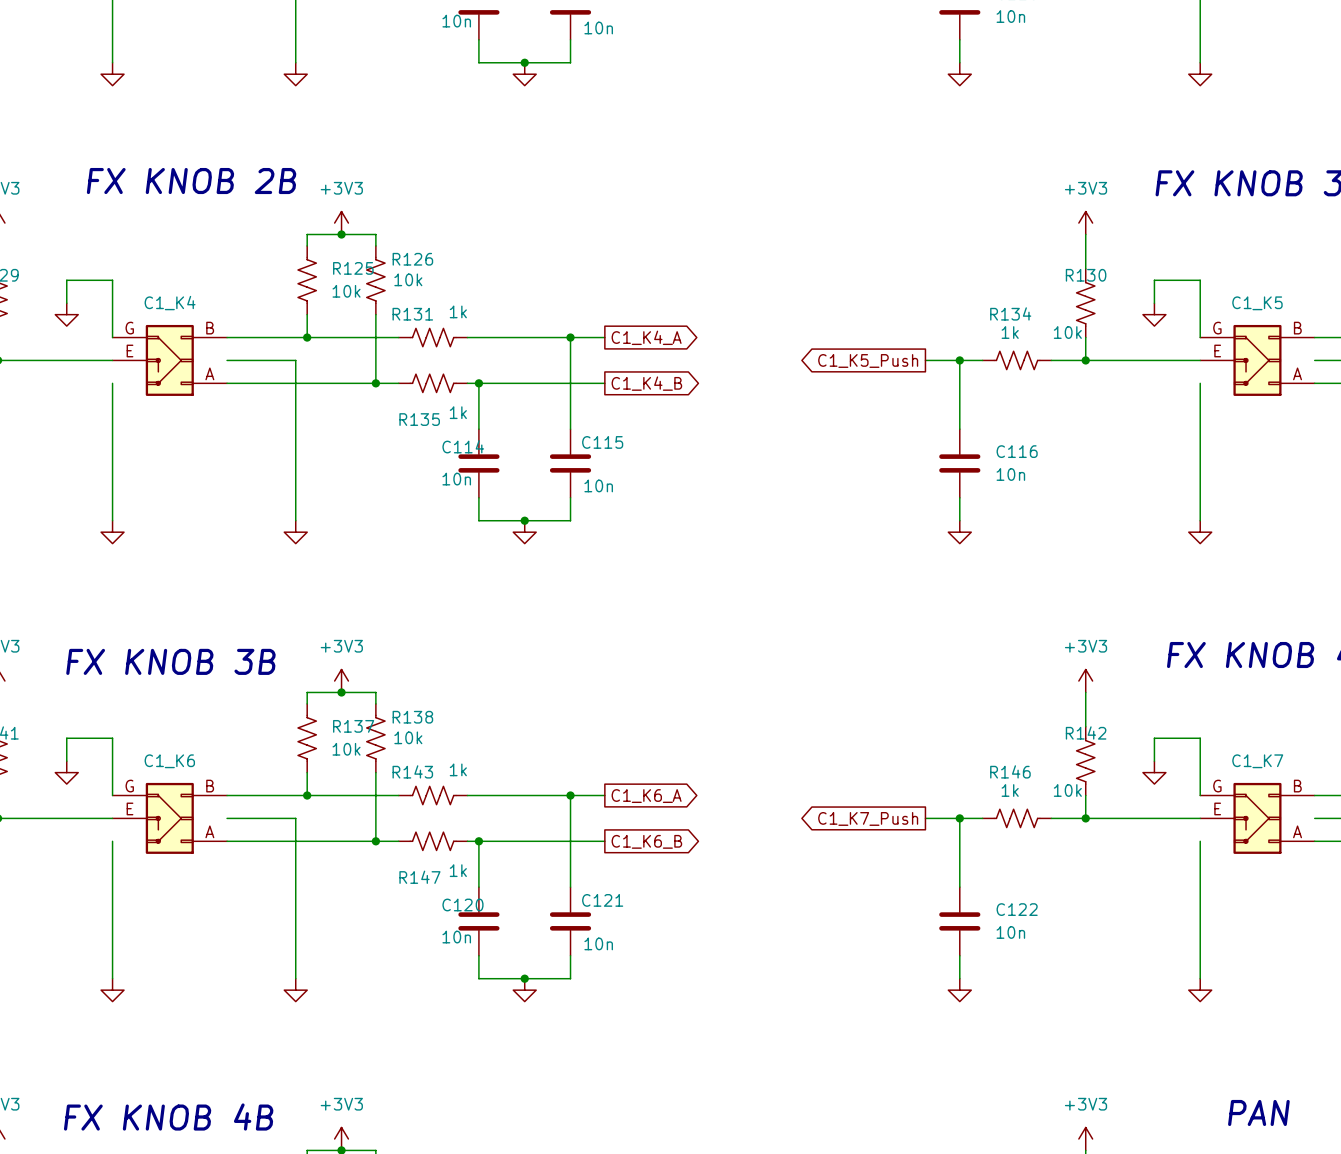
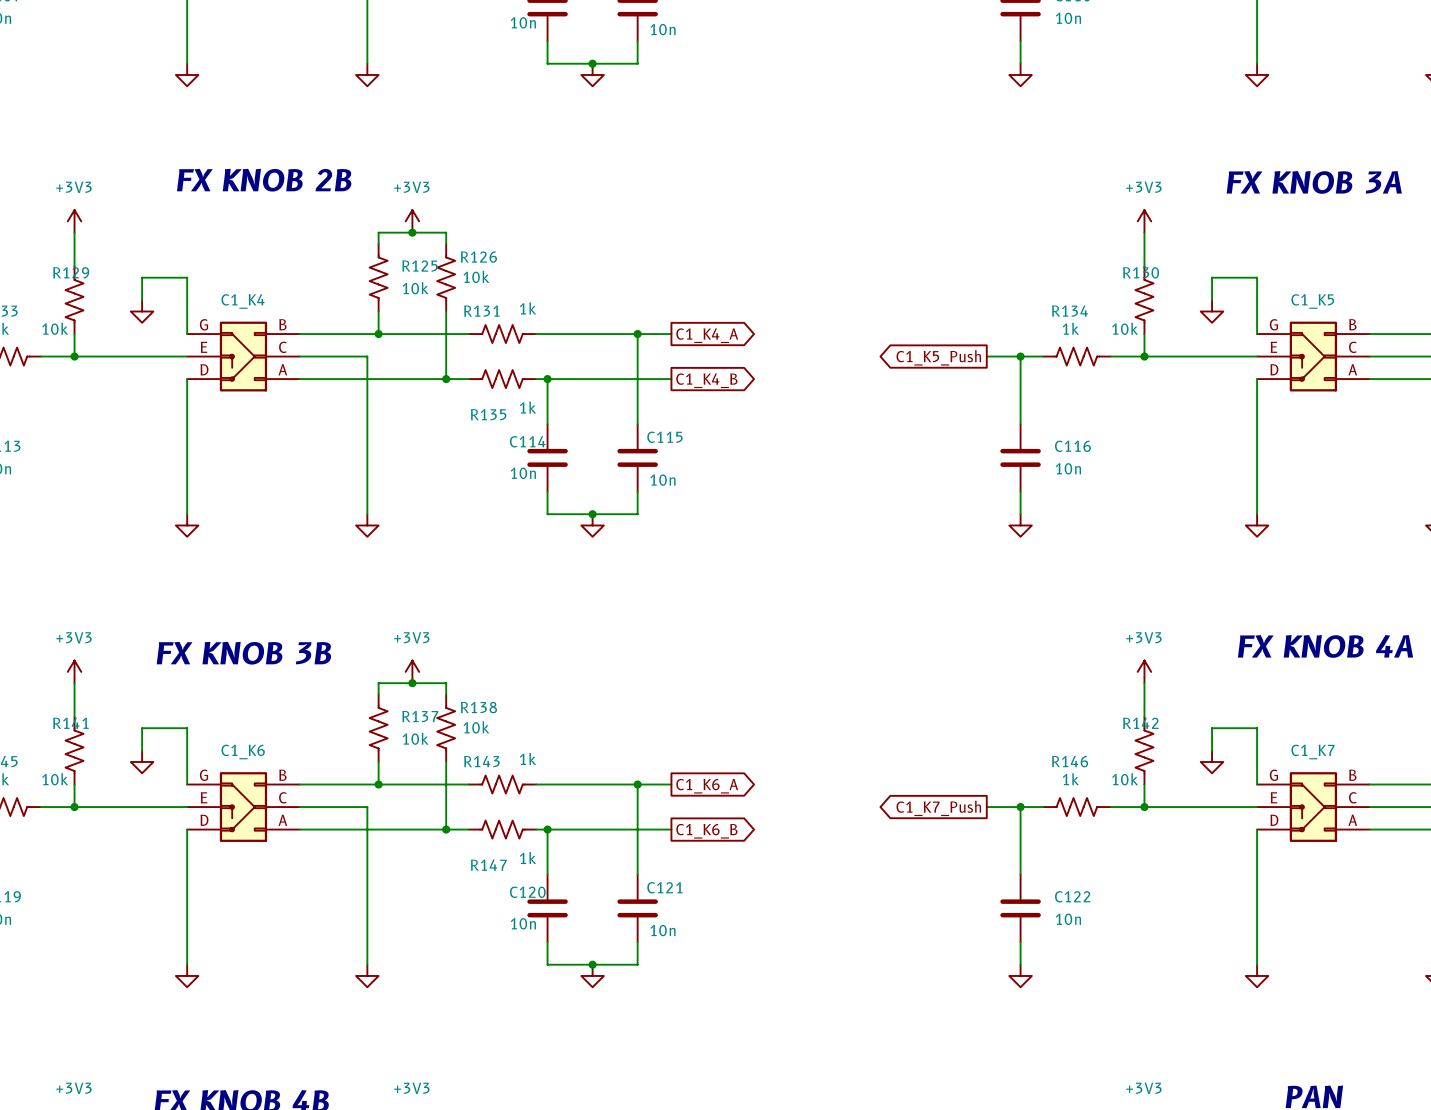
part symbol: [112, 324, 228, 396] -> [187, 321, 300, 392]
part symbol: [1200, 324, 1315, 396] -> [1257, 321, 1370, 392]
part symbol: [112, 782, 228, 854] -> [187, 772, 300, 842]
part symbol: [1200, 782, 1315, 854] -> [1257, 772, 1370, 842]

